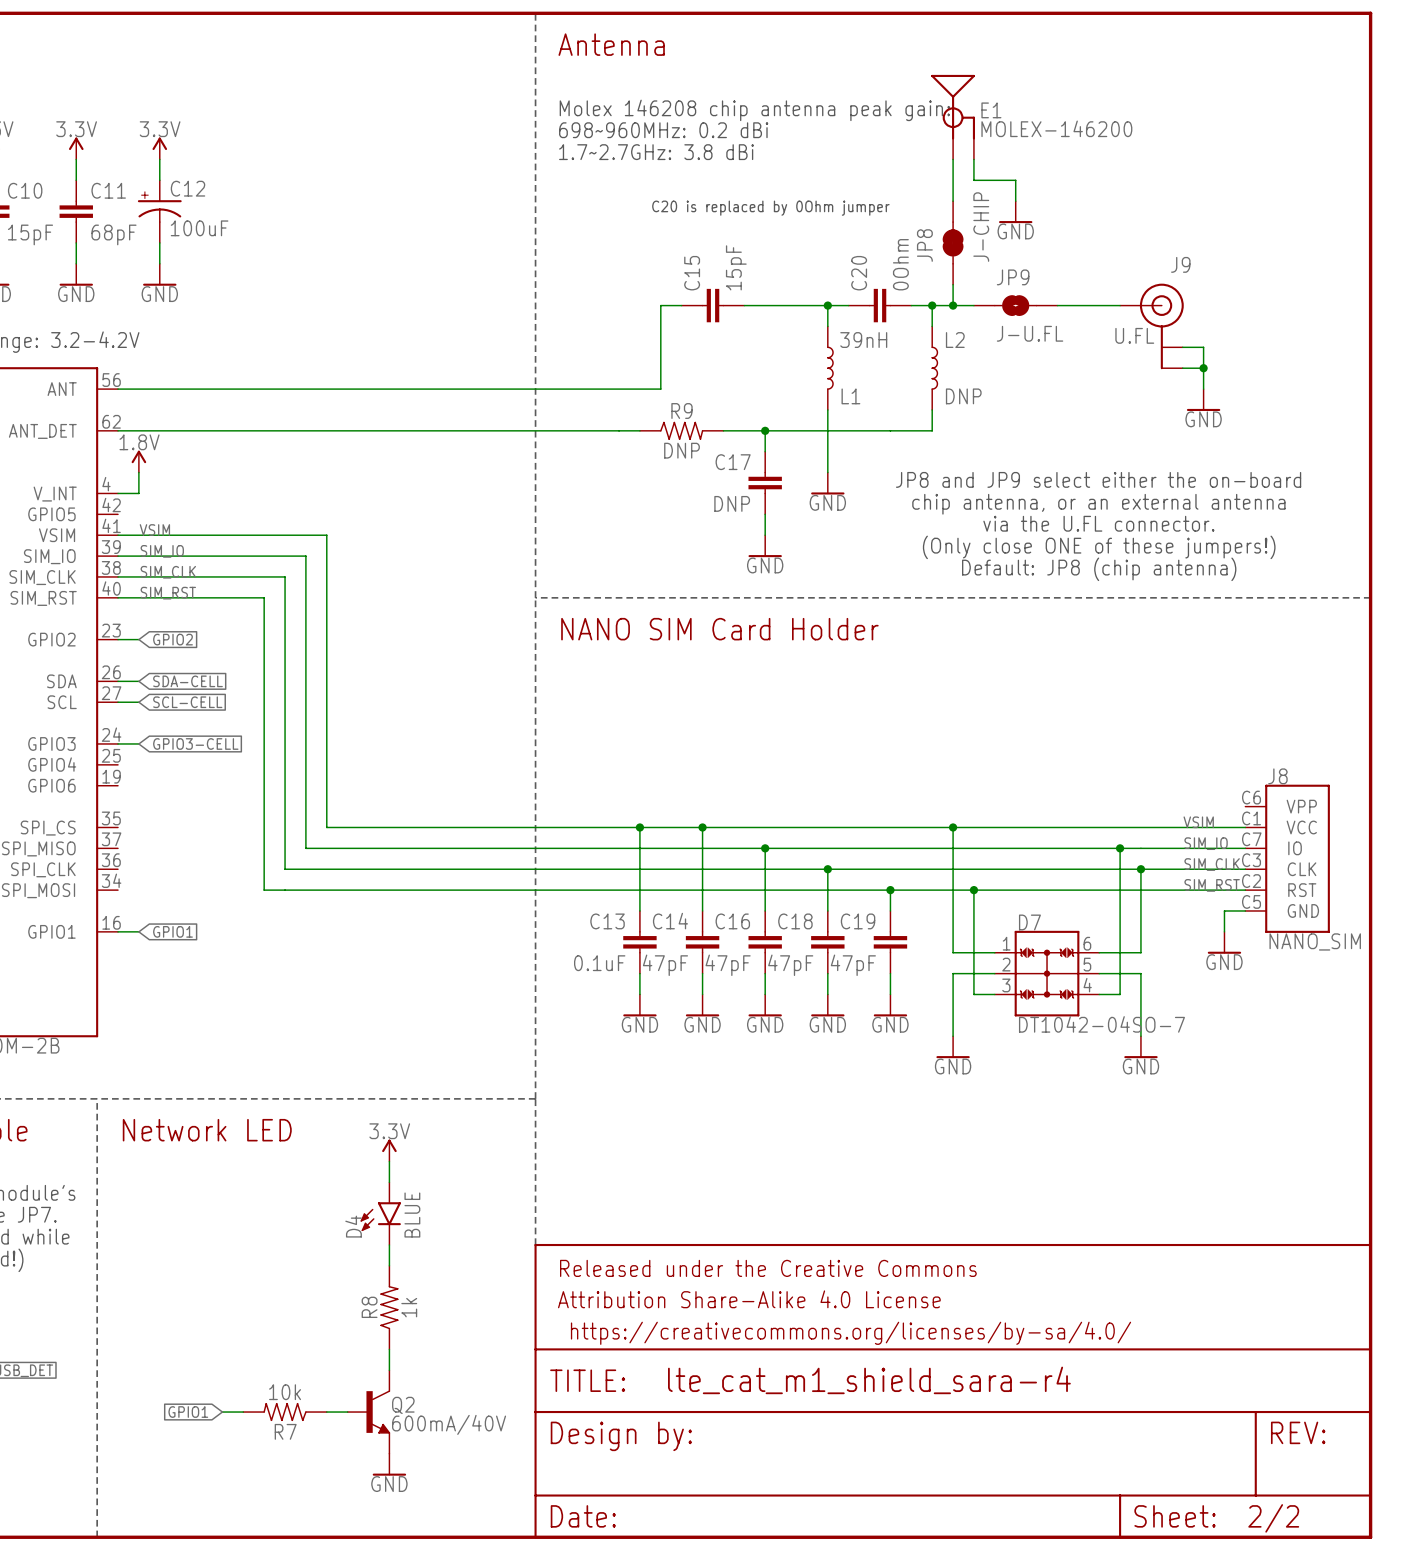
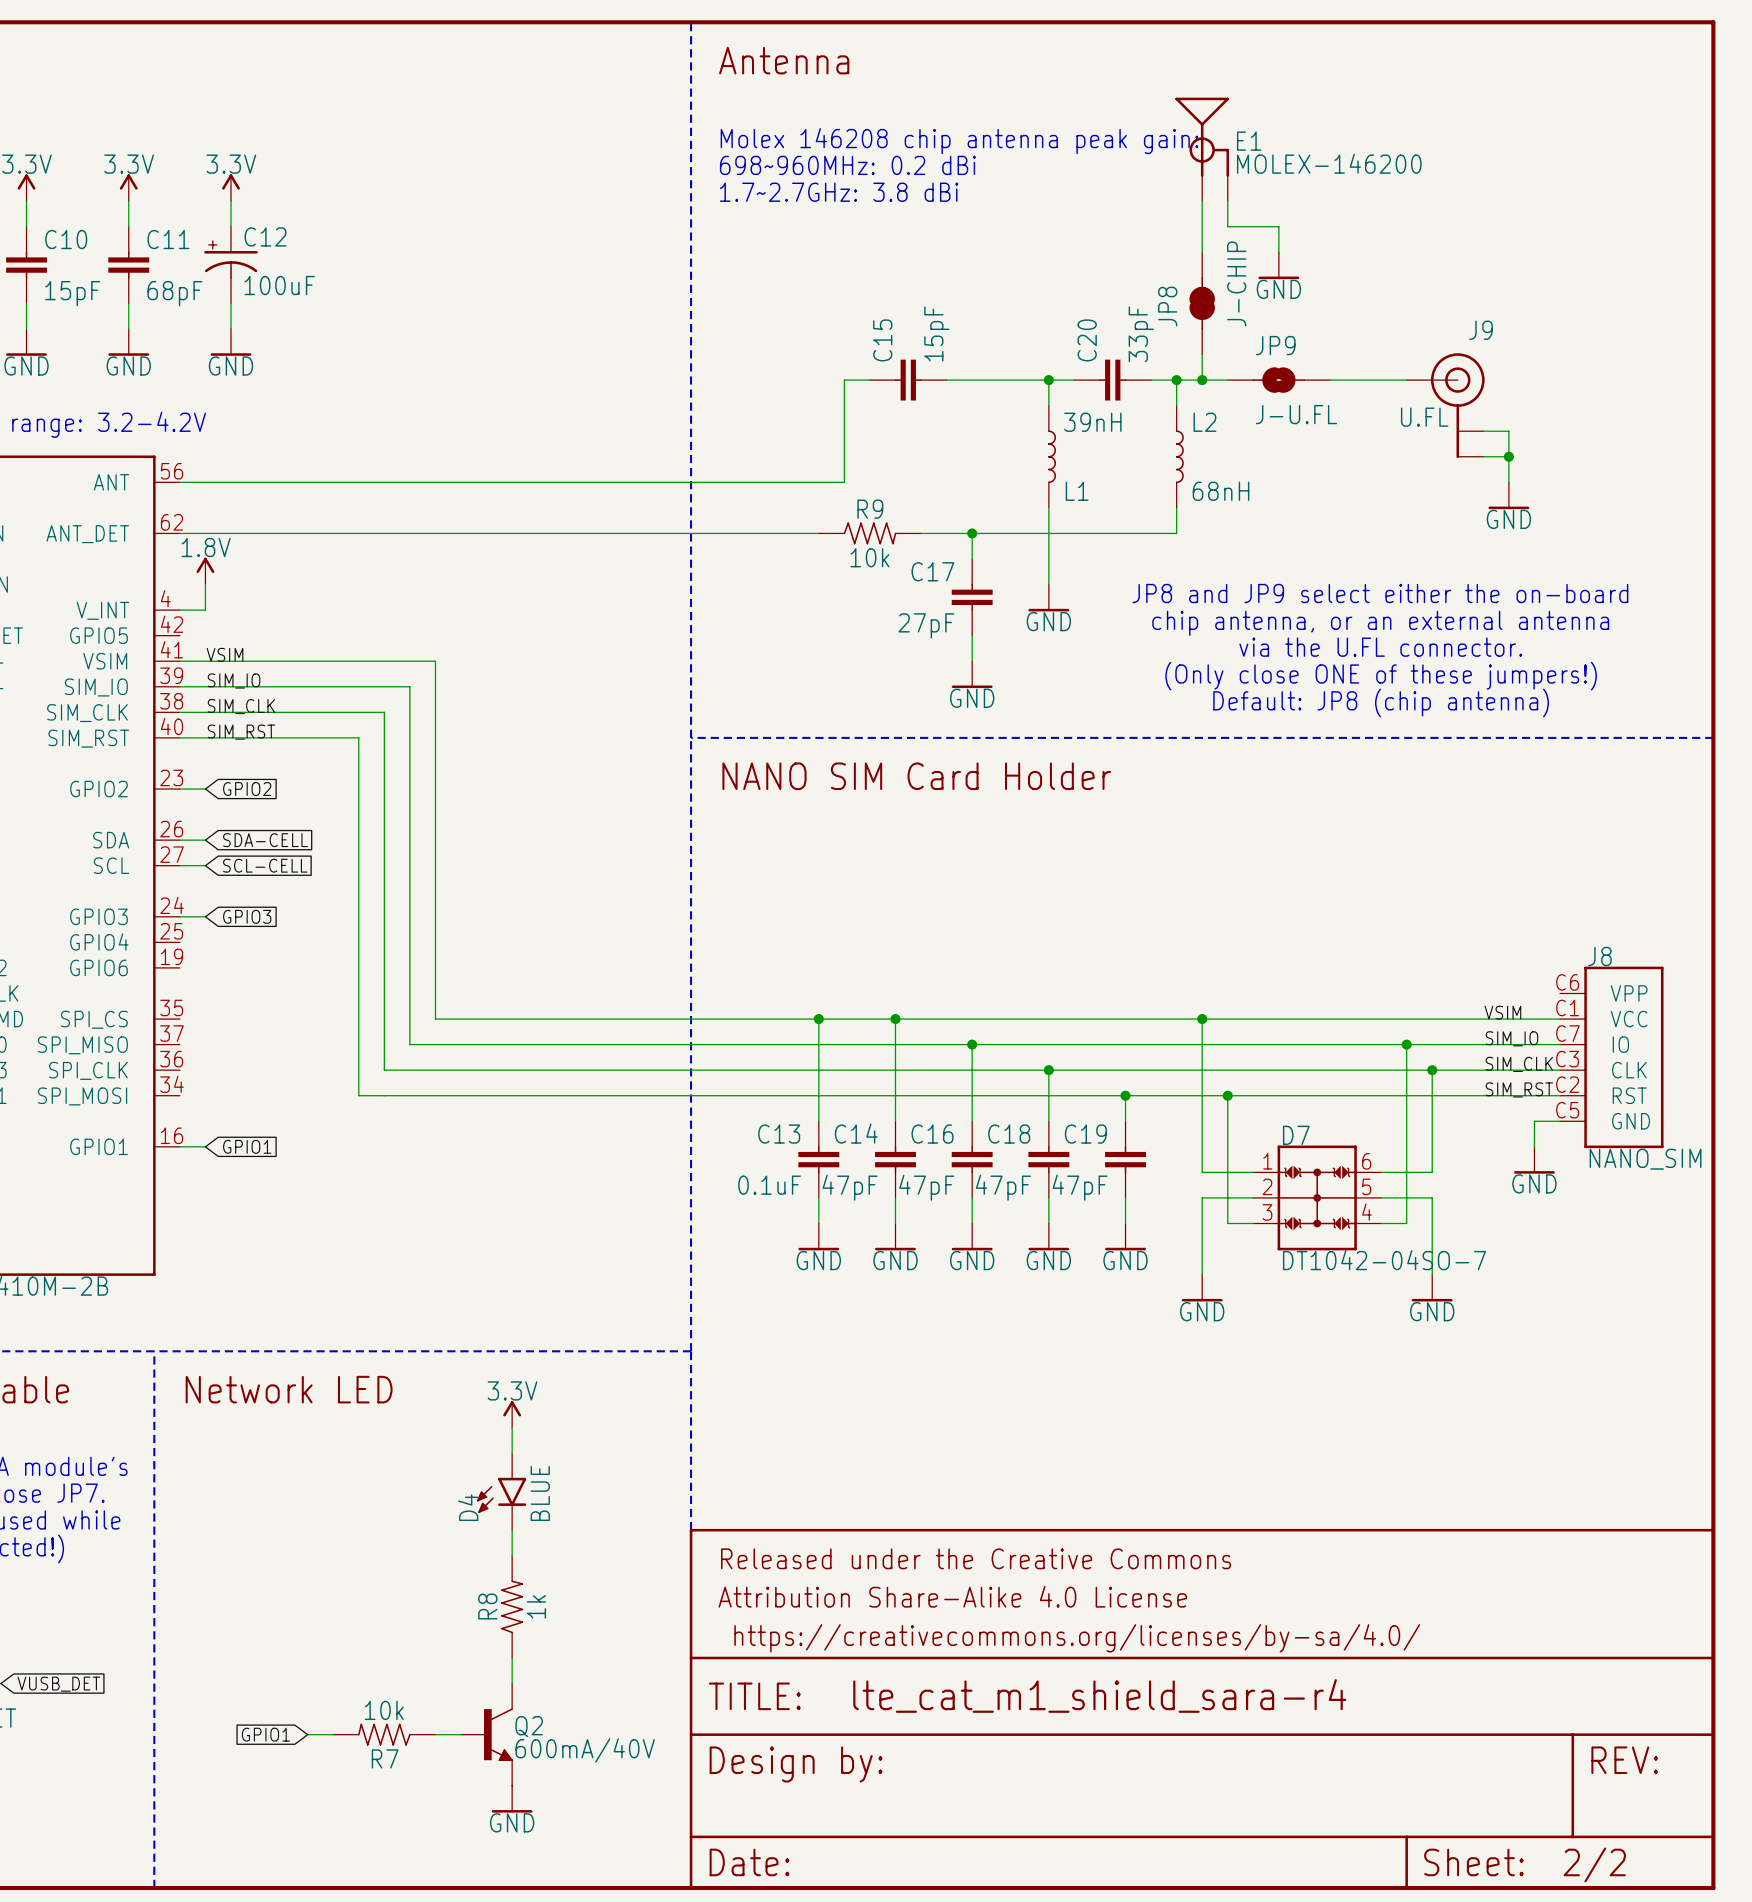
text: C20 is replaced by 0Ohm jumper (770, 208) -> none
C20 value: 0Ohm (900, 264) -> 33pF (1141, 334)
L2 value: DNP (963, 396) -> 68nH (1221, 491)
R9 value: DNP (682, 450) -> 10k (869, 557)
C17 value: DNP (732, 503) -> 27pF (926, 625)
global label: GPIO3-CELL (195, 743) -> GPIO3 (247, 916)

